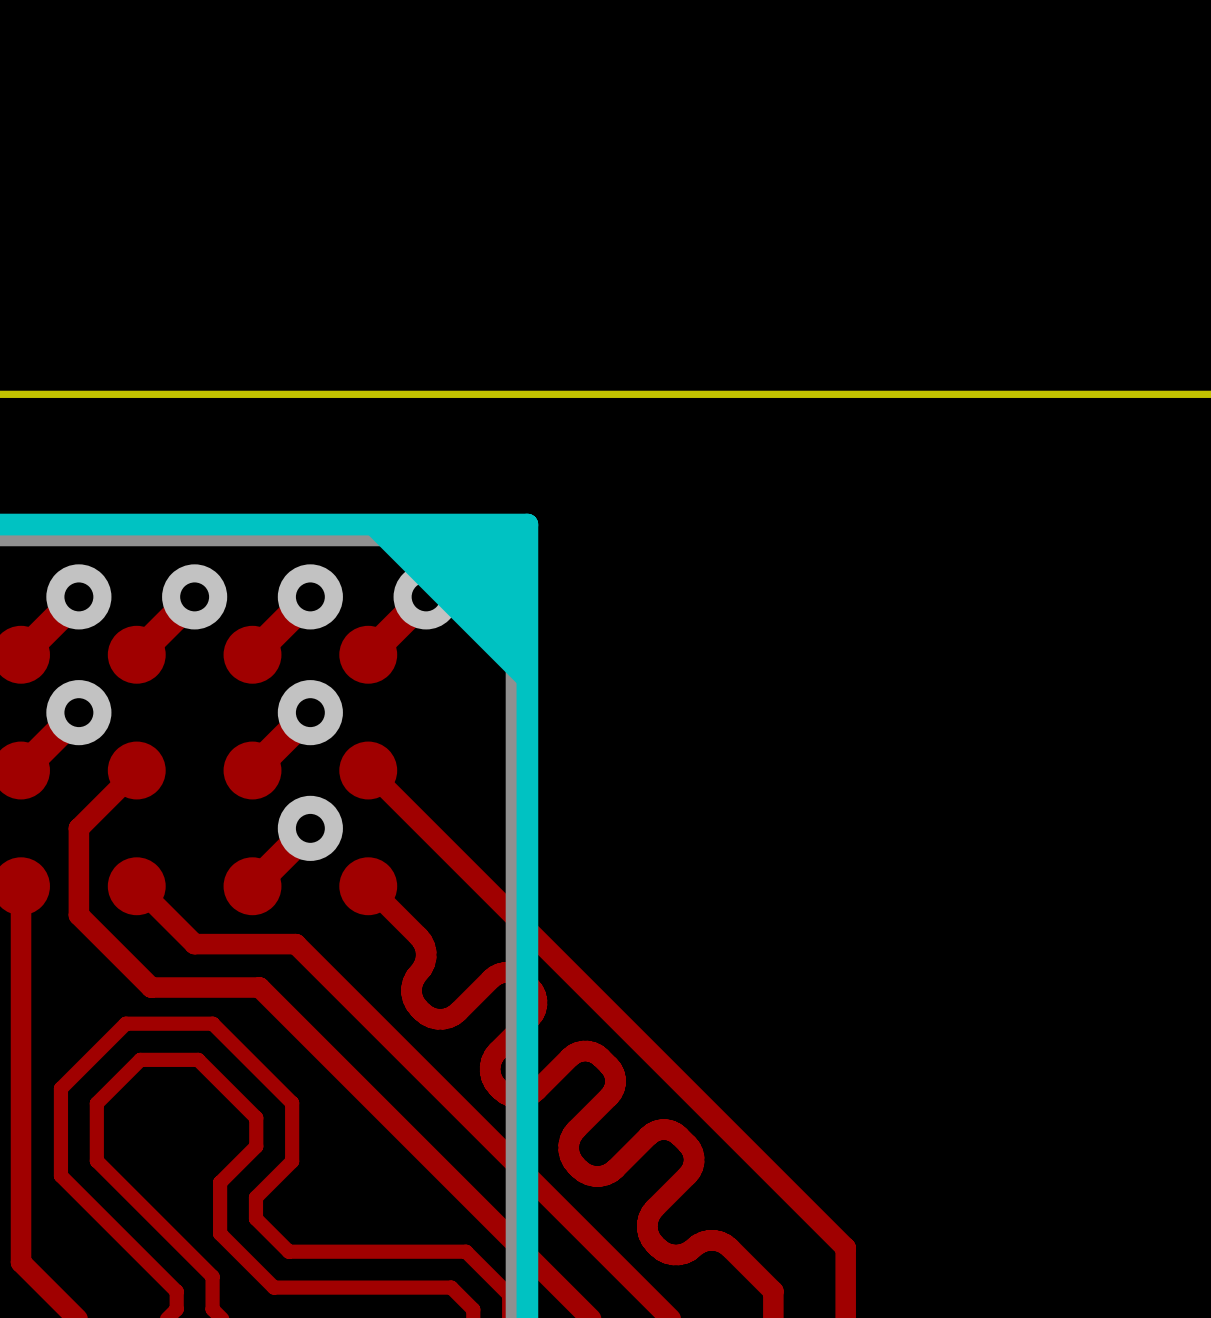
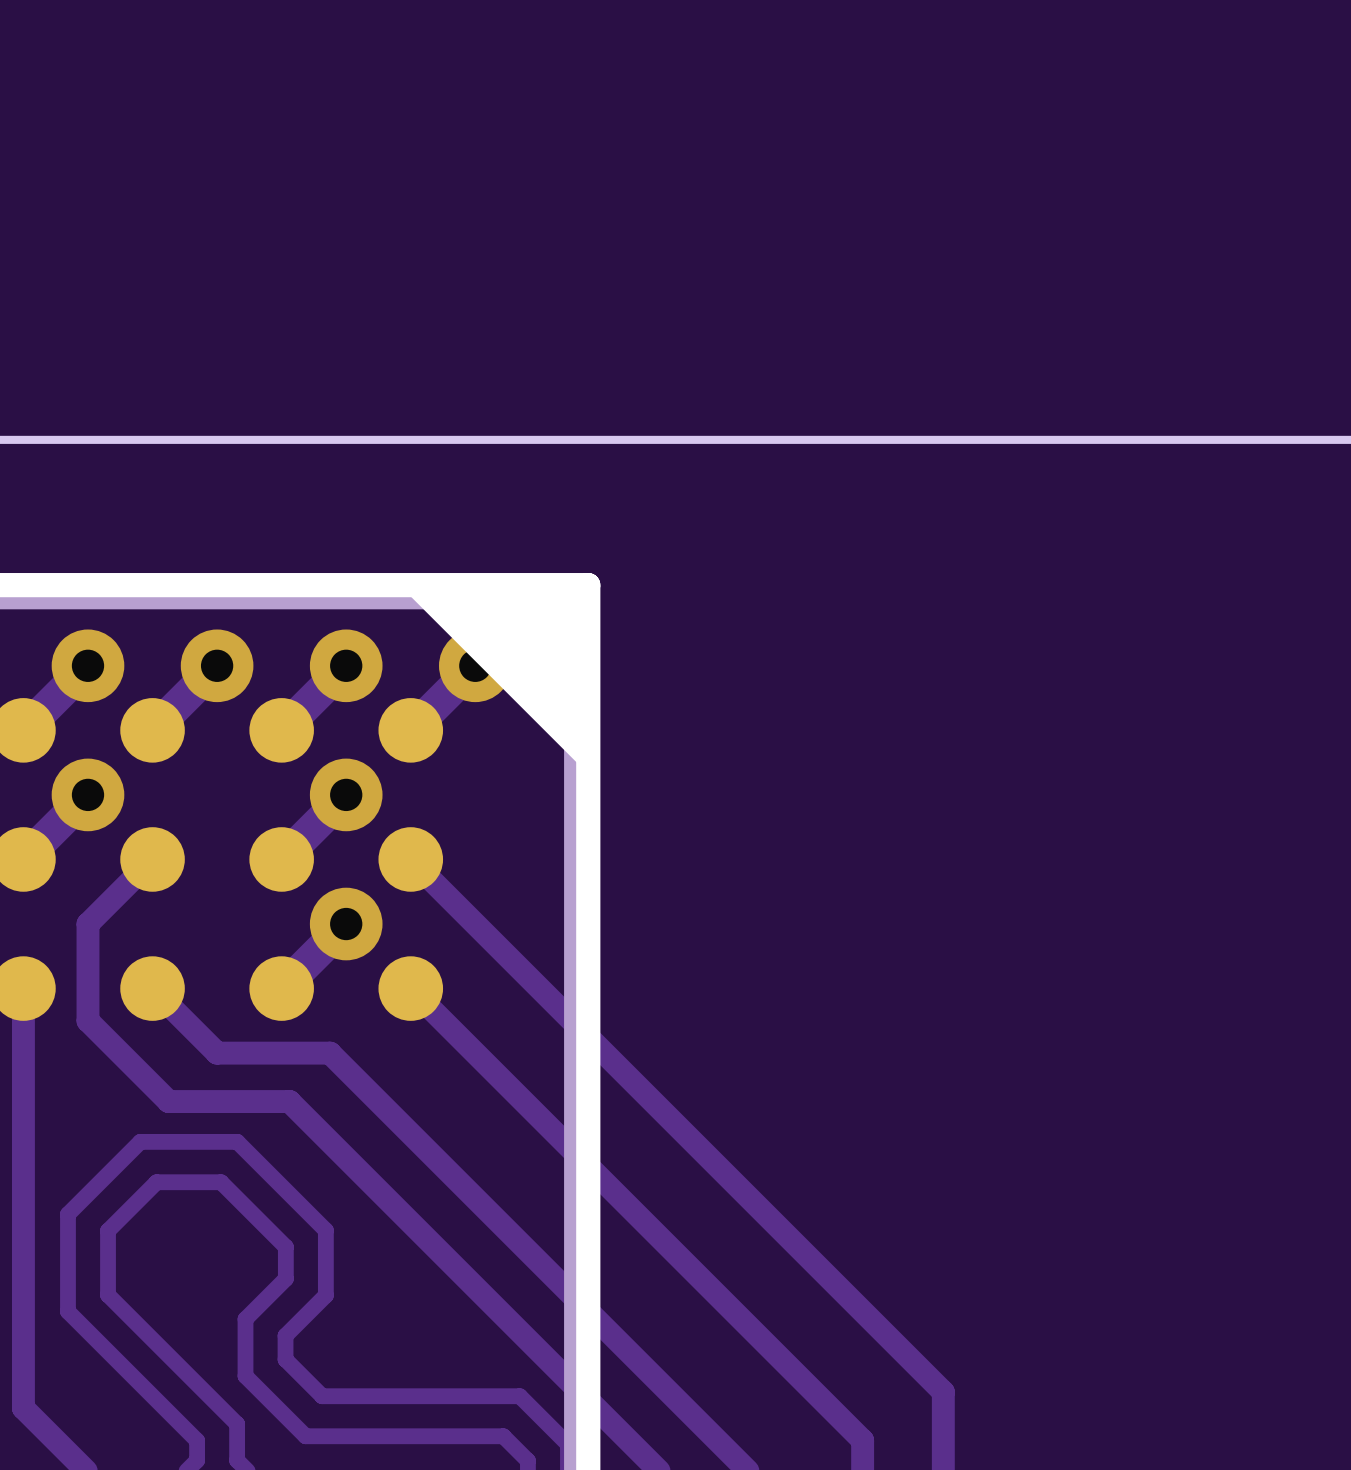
track: (418, 936) (424, 946) (426, 957) (422, 968) (412, 982) (411, 993) (418, 1008) (431, 1017) (443, 1019) (453, 1015) (491, 978) (499, 973) (509, 972) (518, 975) (533, 991) (536, 1000) (533, 1014) (497, 1051) (491, 1060) (491, 1077) (497, 1087) (505, 1094) (516, 1097) (532, 1094) (569, 1057) (582, 1051) (596, 1054) (612, 1069) (615, 1078) (612, 1092) (576, 1129) (570, 1139) (570, 1156) (576, 1165) (583, 1172) (594, 1176) (610, 1172) (648, 1135) (661, 1129) (675, 1132) (690, 1148) (694, 1157) (690, 1171) (654, 1208) (648, 1217) (648, 1234) (658, 1247) (673, 1254) (684, 1253) (698, 1244) (708, 1240) (720, 1241) (729, 1247) -> (467, 1045) (813, 1391)

